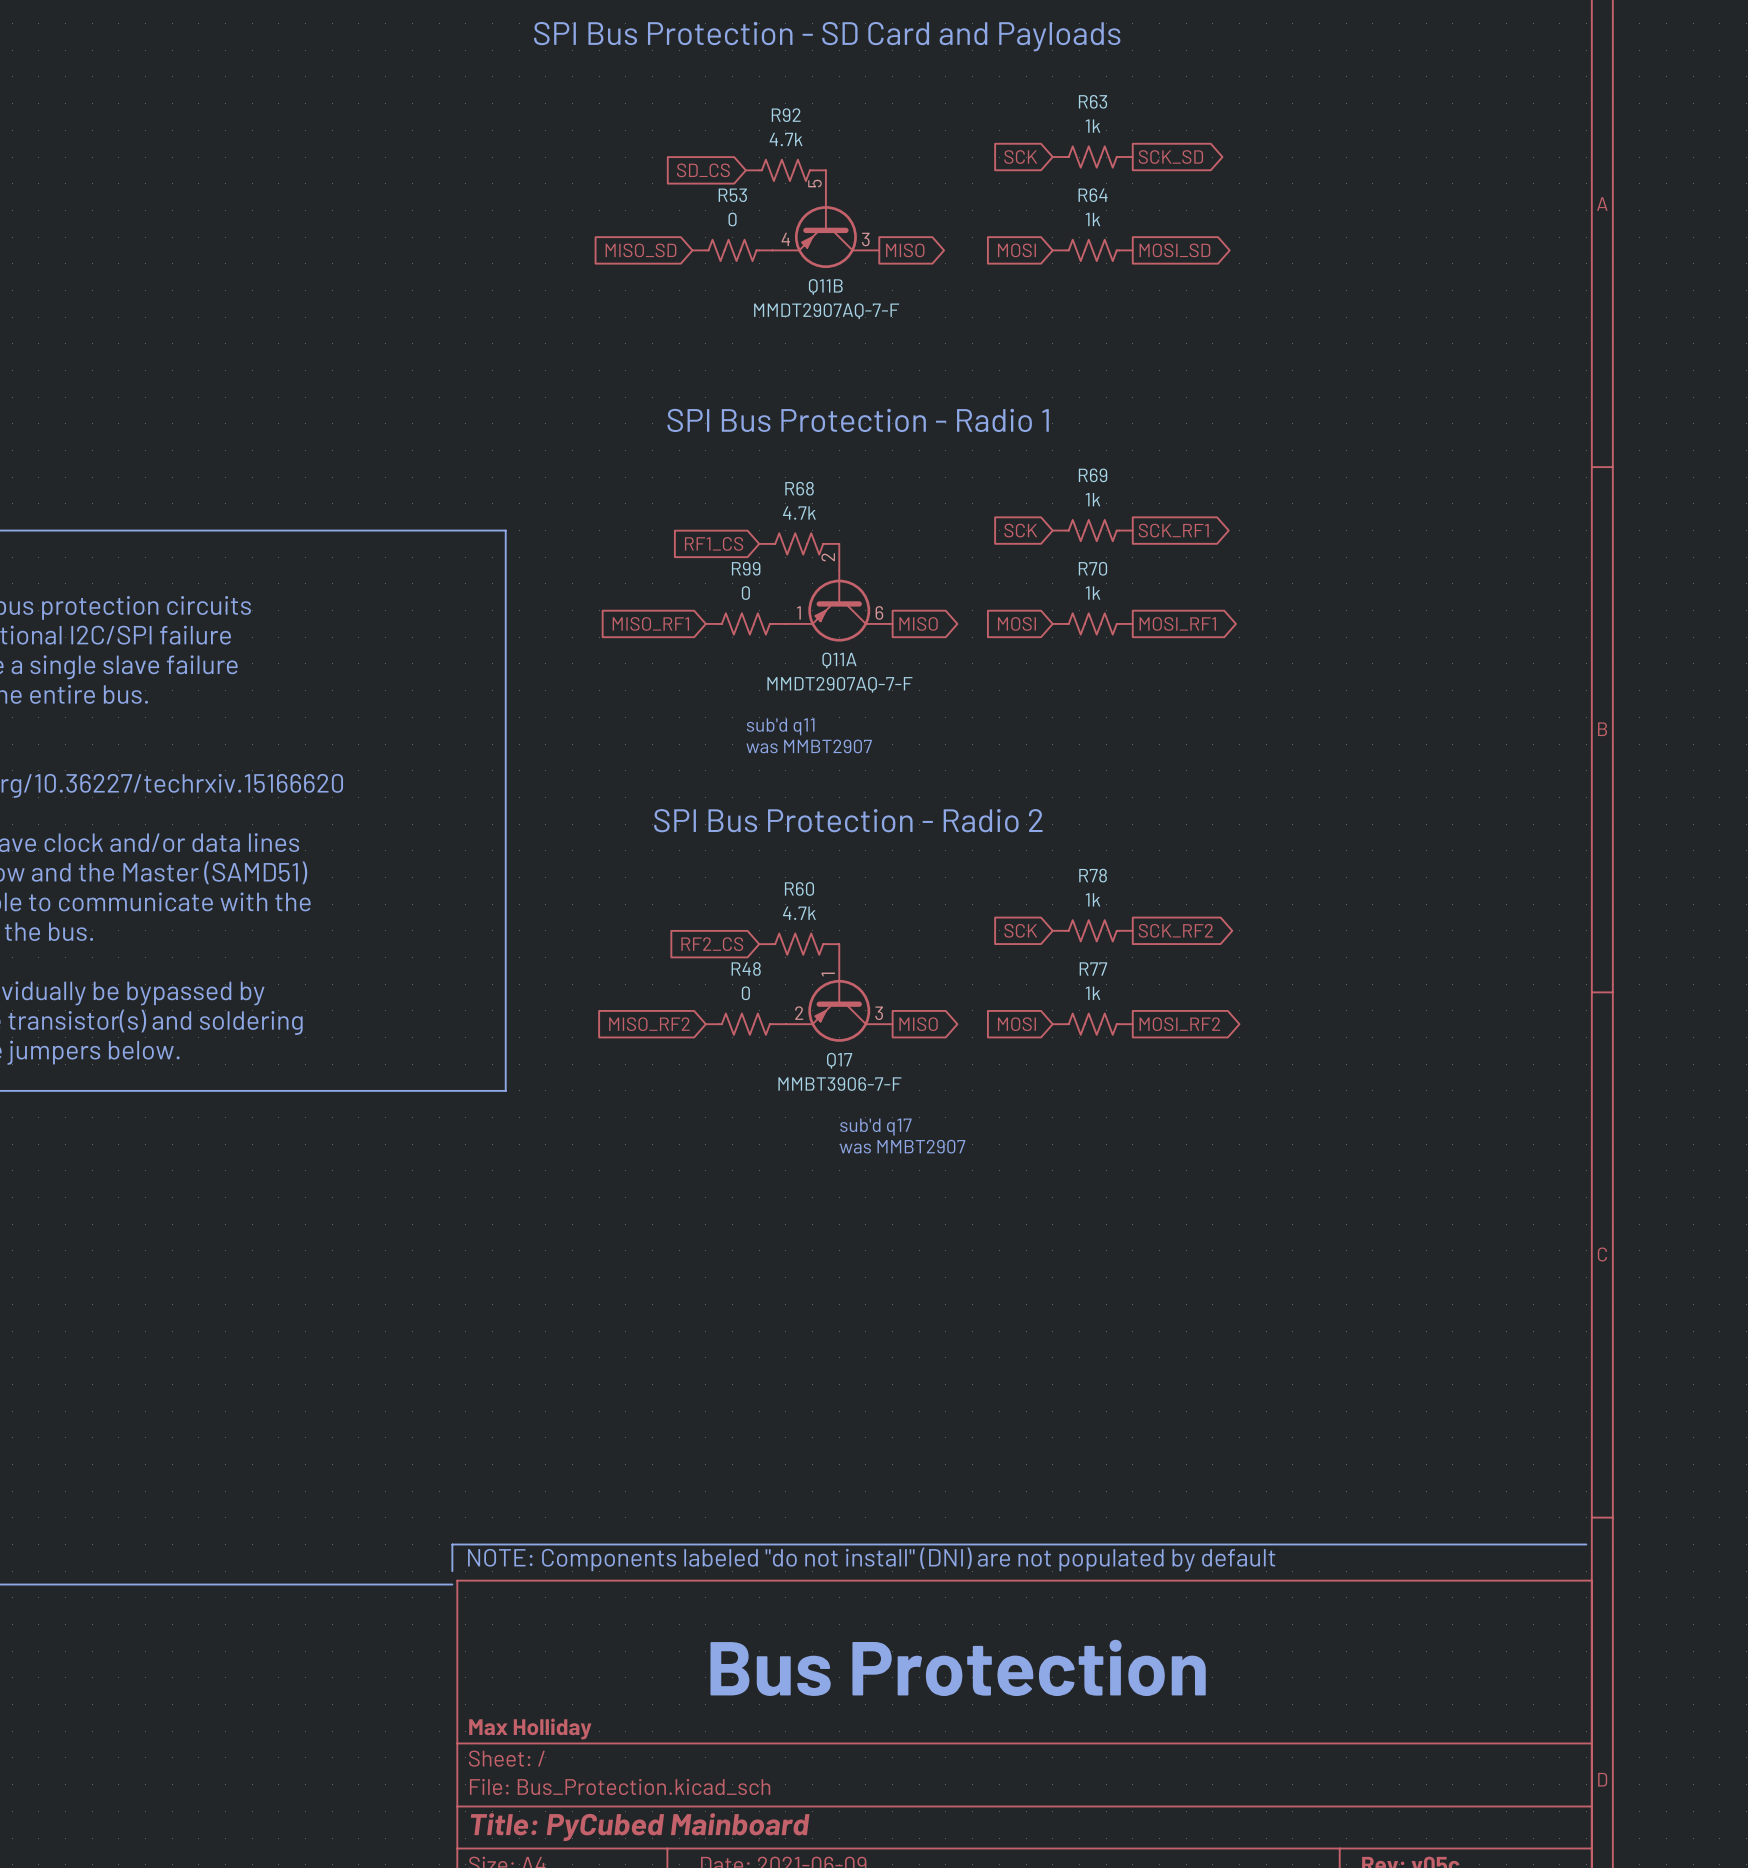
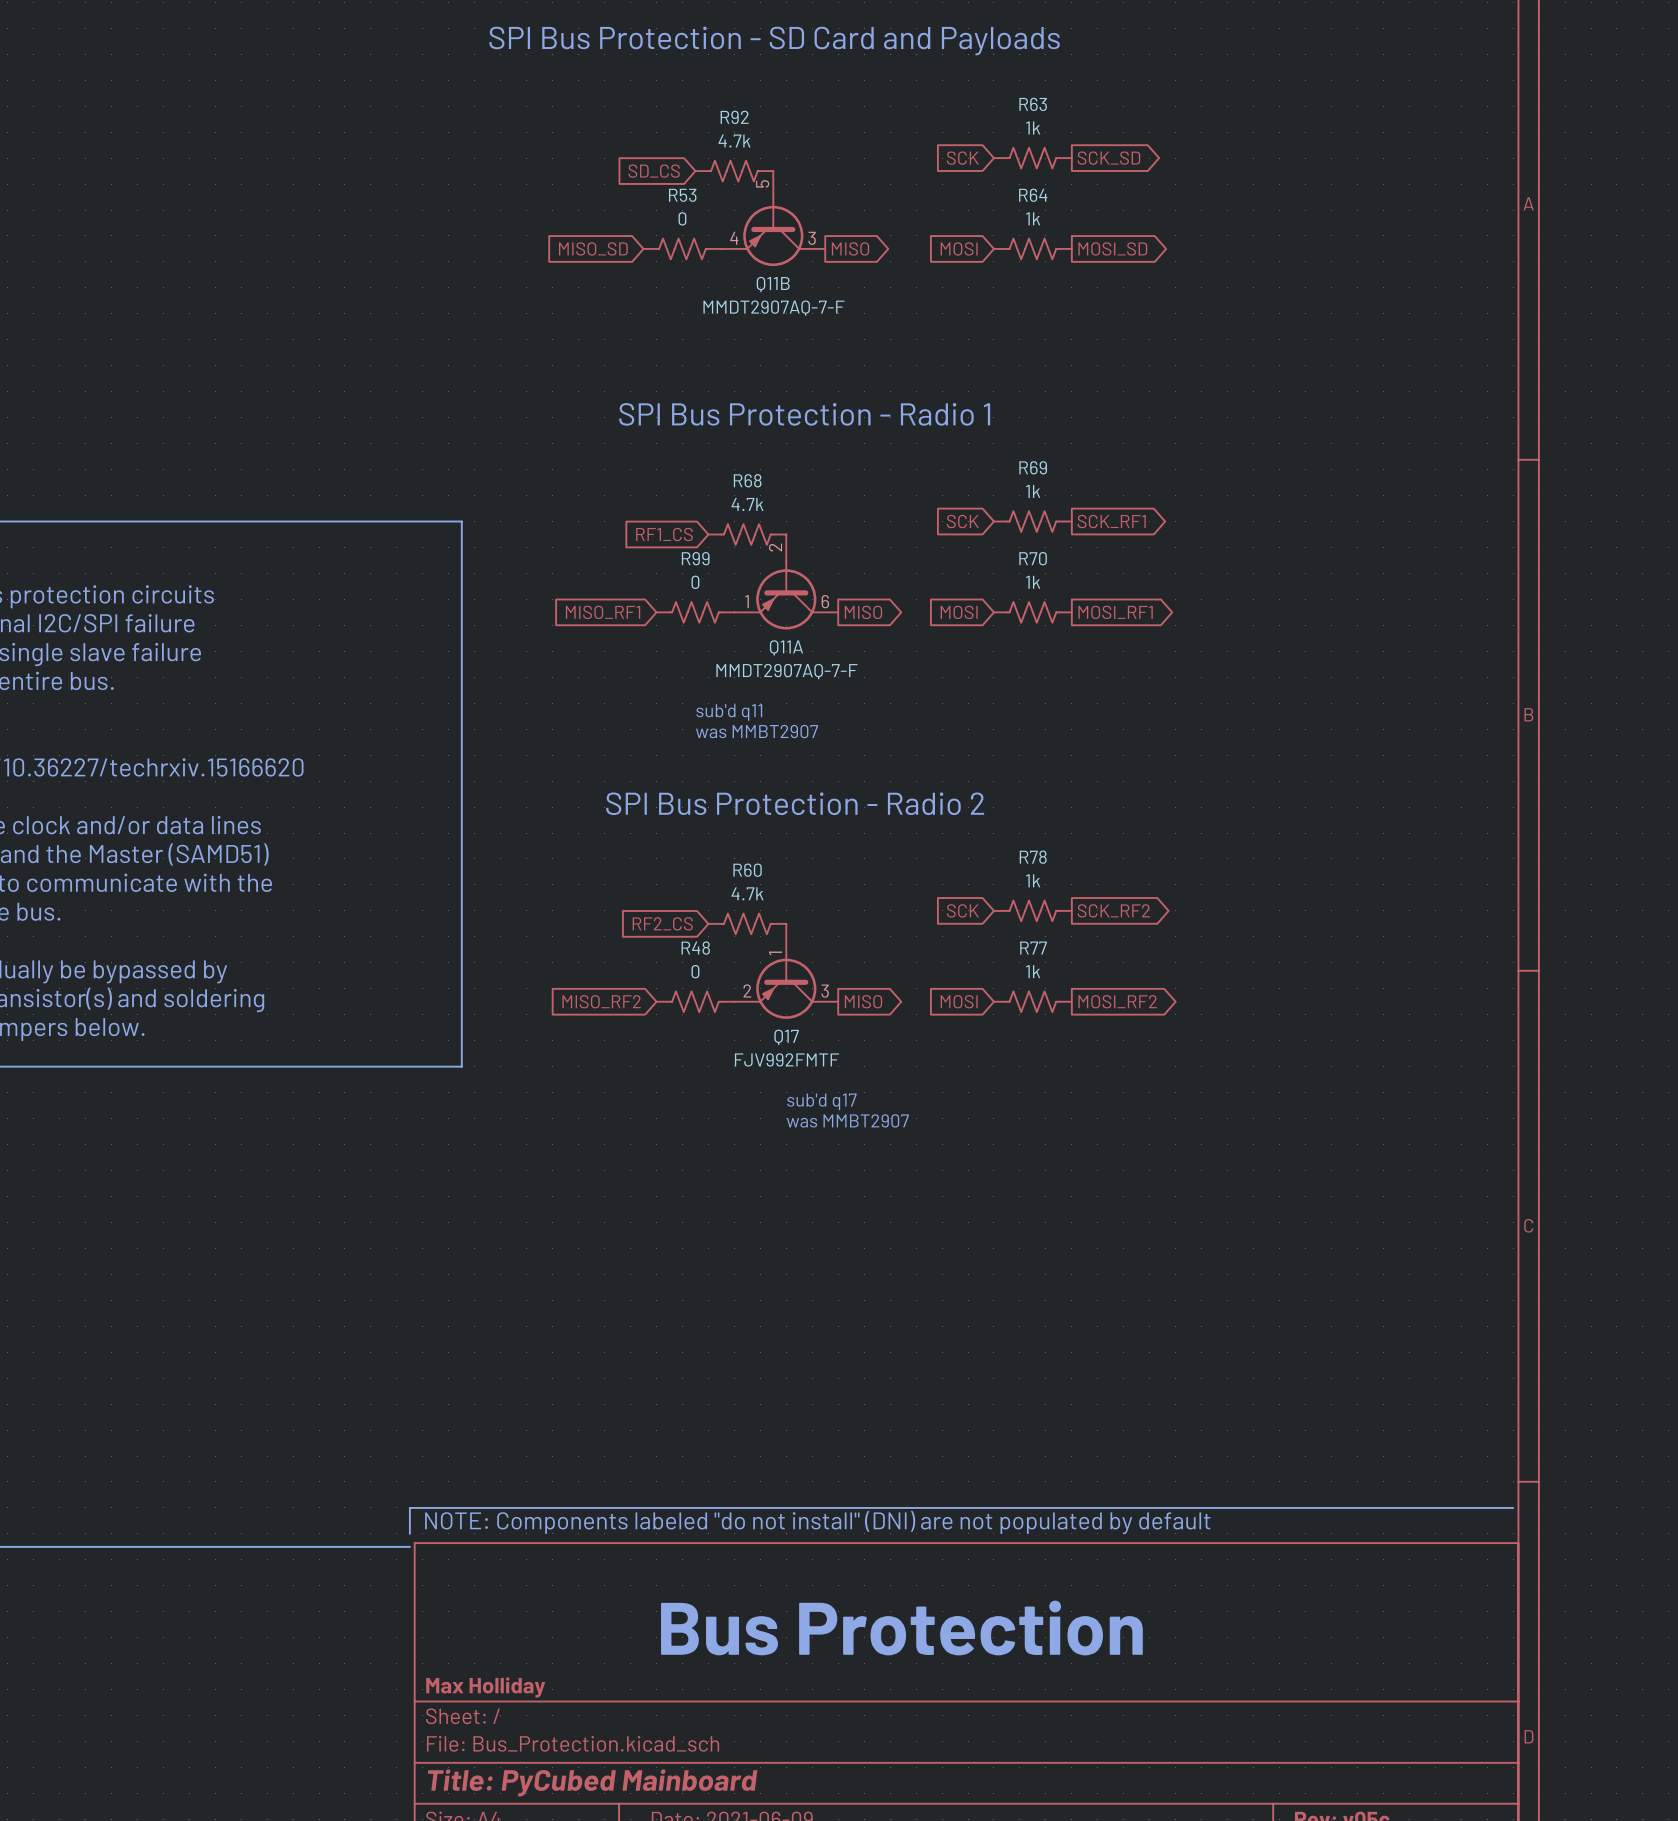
Q17 value: MMBT3906-7-F (839, 1084) -> FJV992FMTF (786, 1059)

